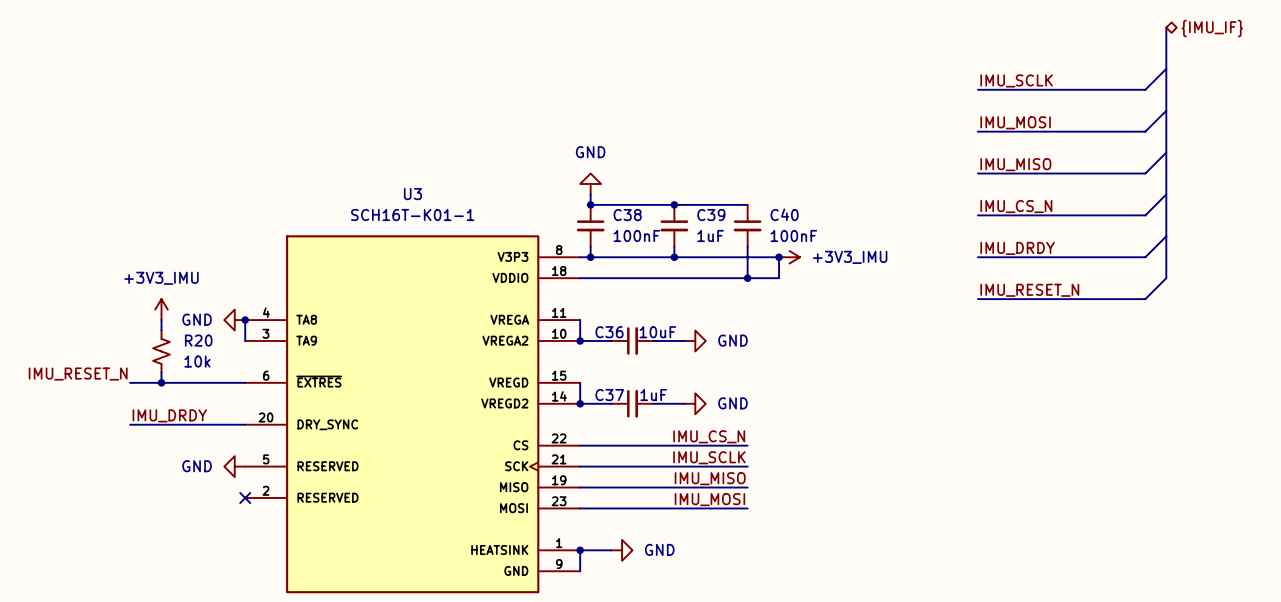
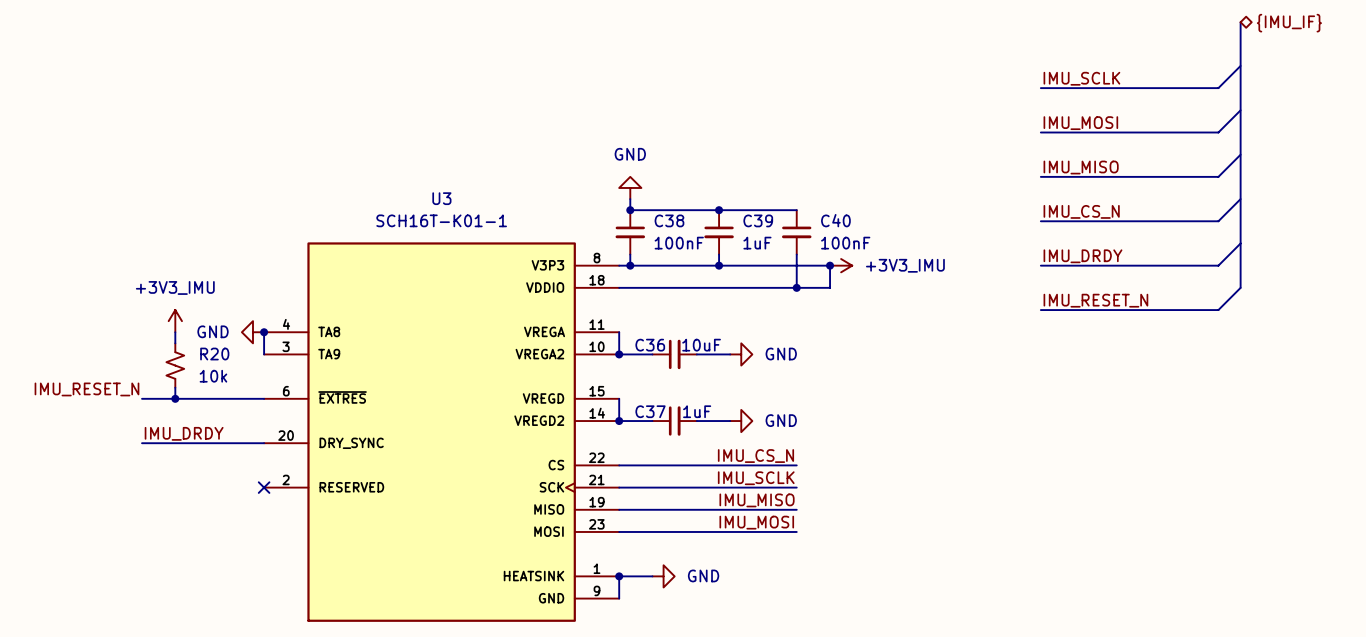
U3 symbol: [245, 235, 581, 594] -> [264, 242, 620, 622]
power symbol: GND (234, 466) -> none
no-connect mark position: (245, 497) -> (264, 487)

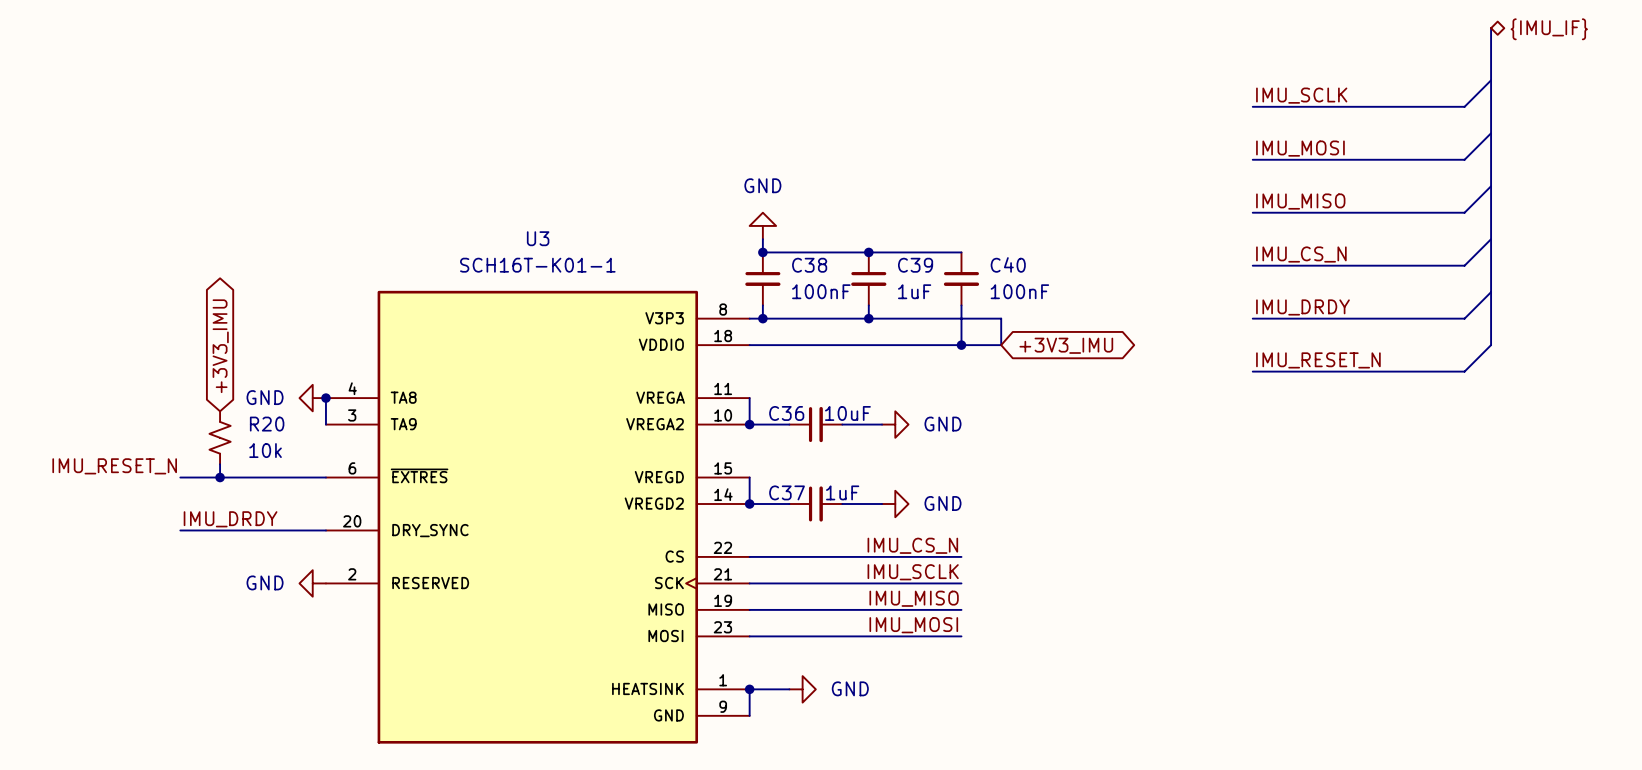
junction: (830, 265) -> none
power symbol: +3V3_IMU (841, 265) -> none
global label: none -> +3V3_IMU (220, 346)
global label: none -> +3V3_IMU (1066, 345)
power symbol: +3V3_IMU (175, 321) -> none
wire: (175, 332) (175, 343) -> none
power symbol: none -> GND (312, 583)
no-connect mark: (264, 487) -> none

